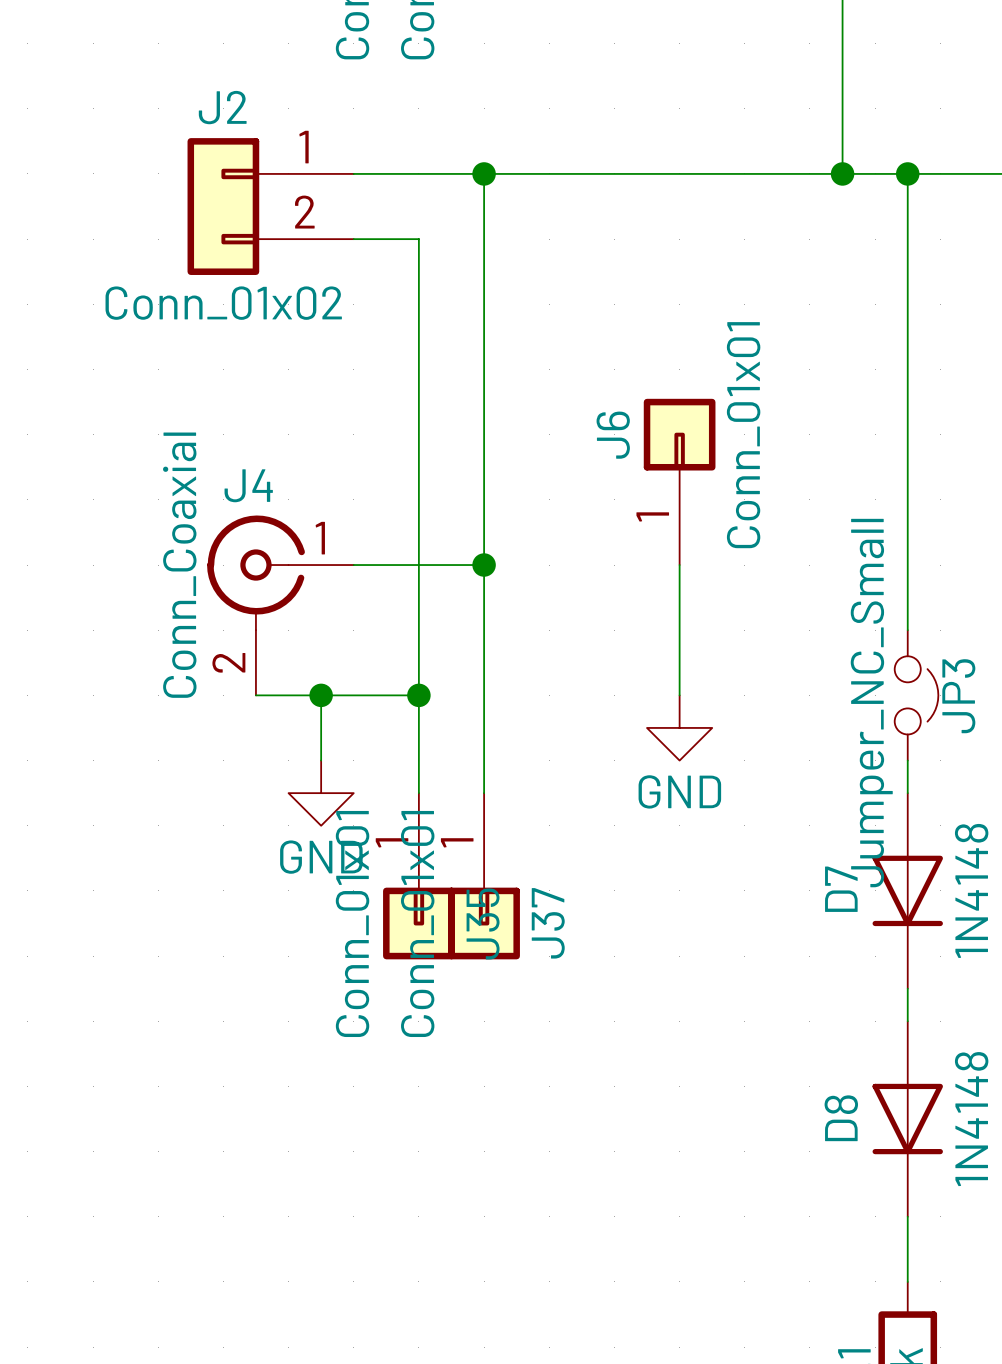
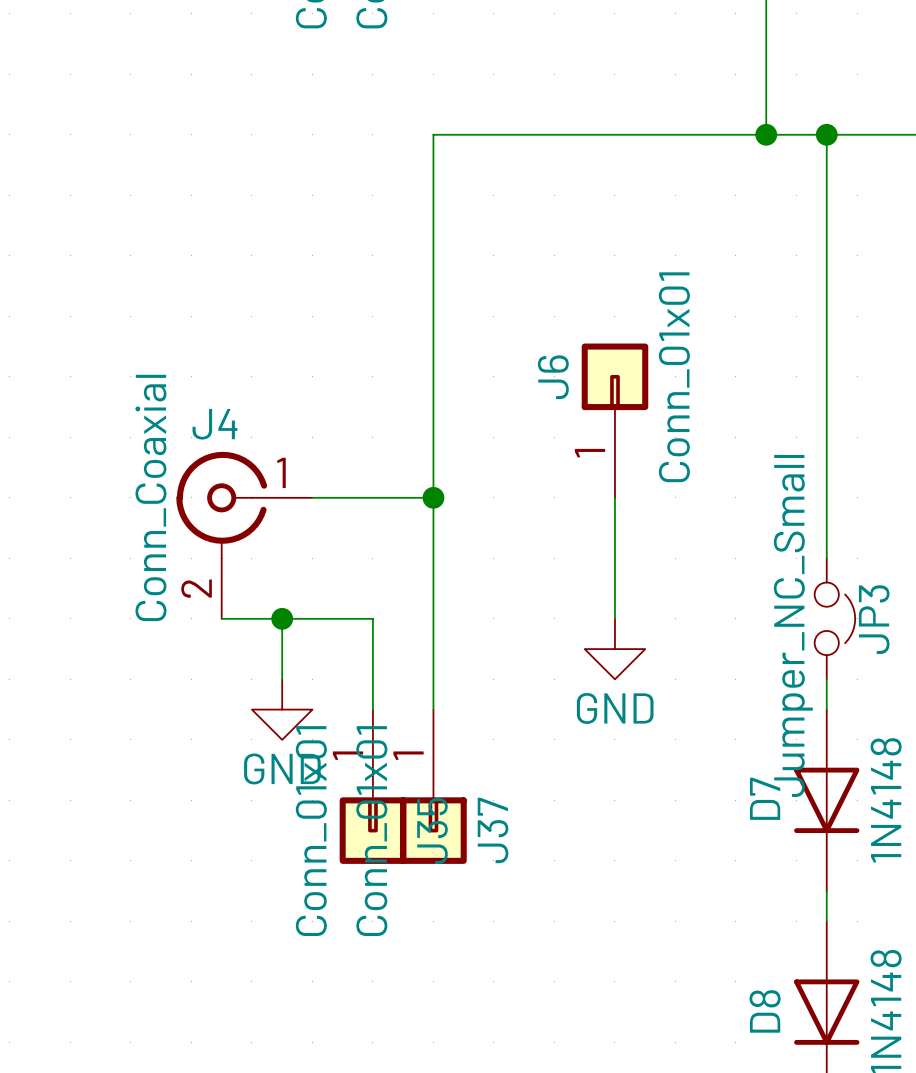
wire: (353, 173) (484, 173) -> none
junction: (484, 173) -> none
J2: Conn_01x02 (270, 206) -> none
wire: (353, 239) (418, 239) (418, 695) -> none
junction: (418, 695) -> none

